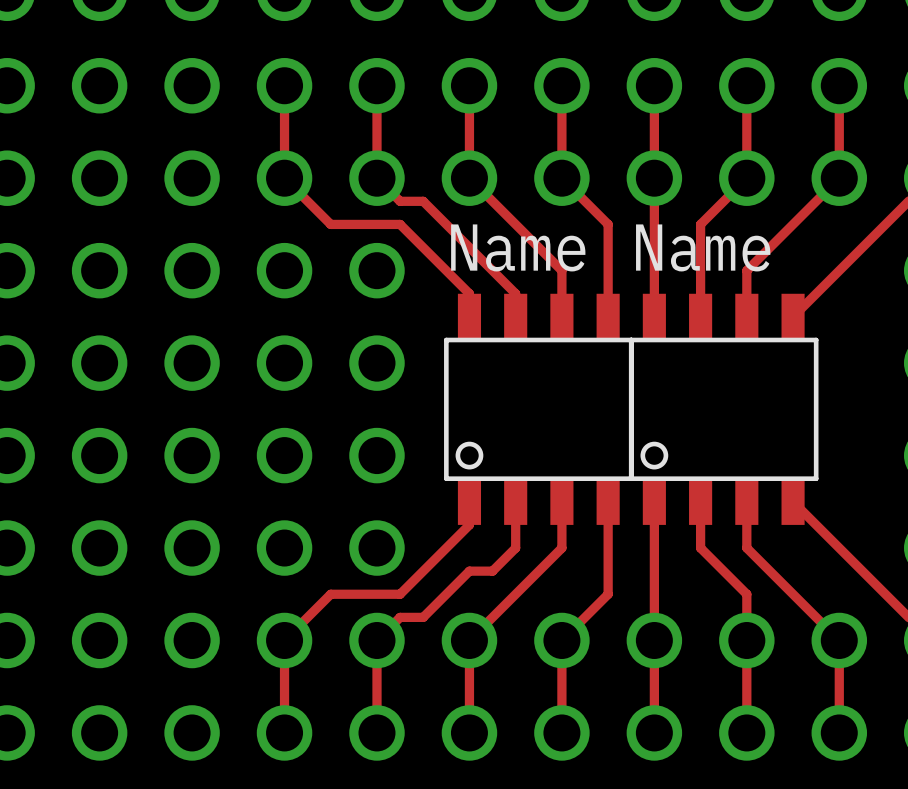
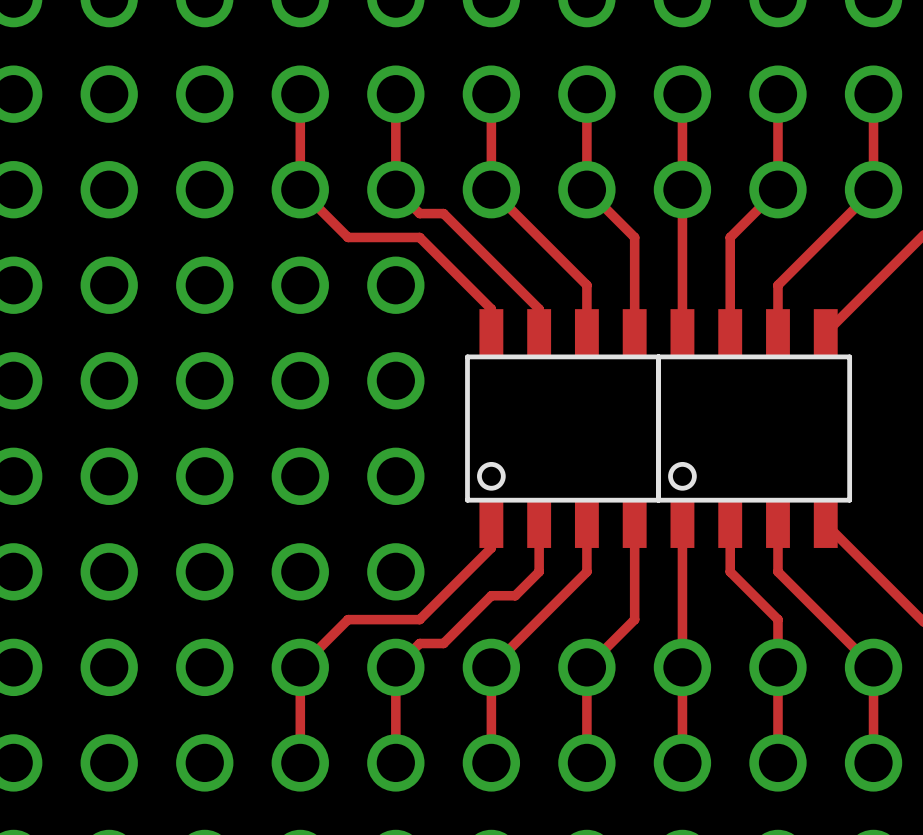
part text: Name (518, 247) -> none
part text: Name (703, 247) -> none

